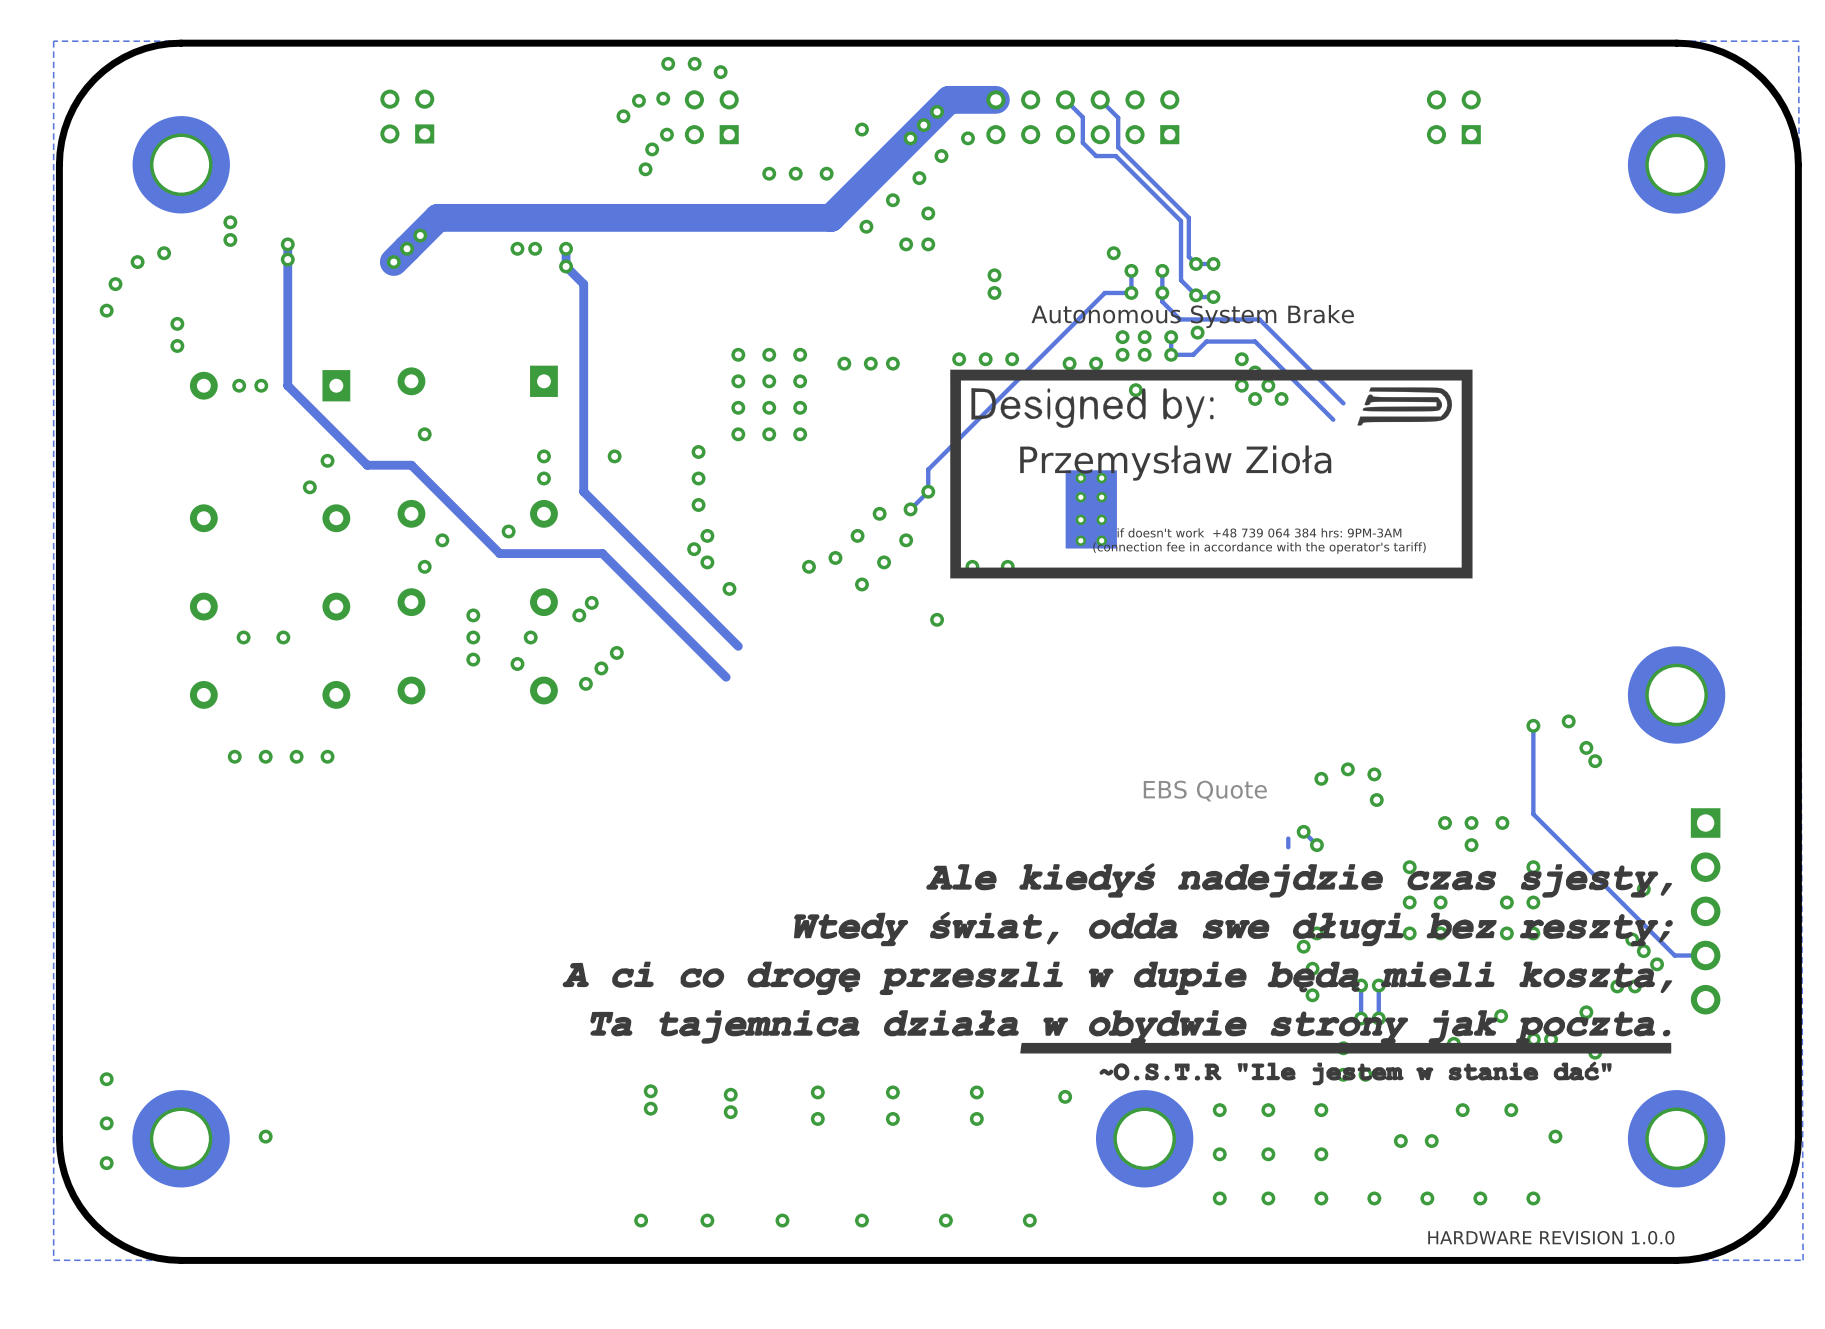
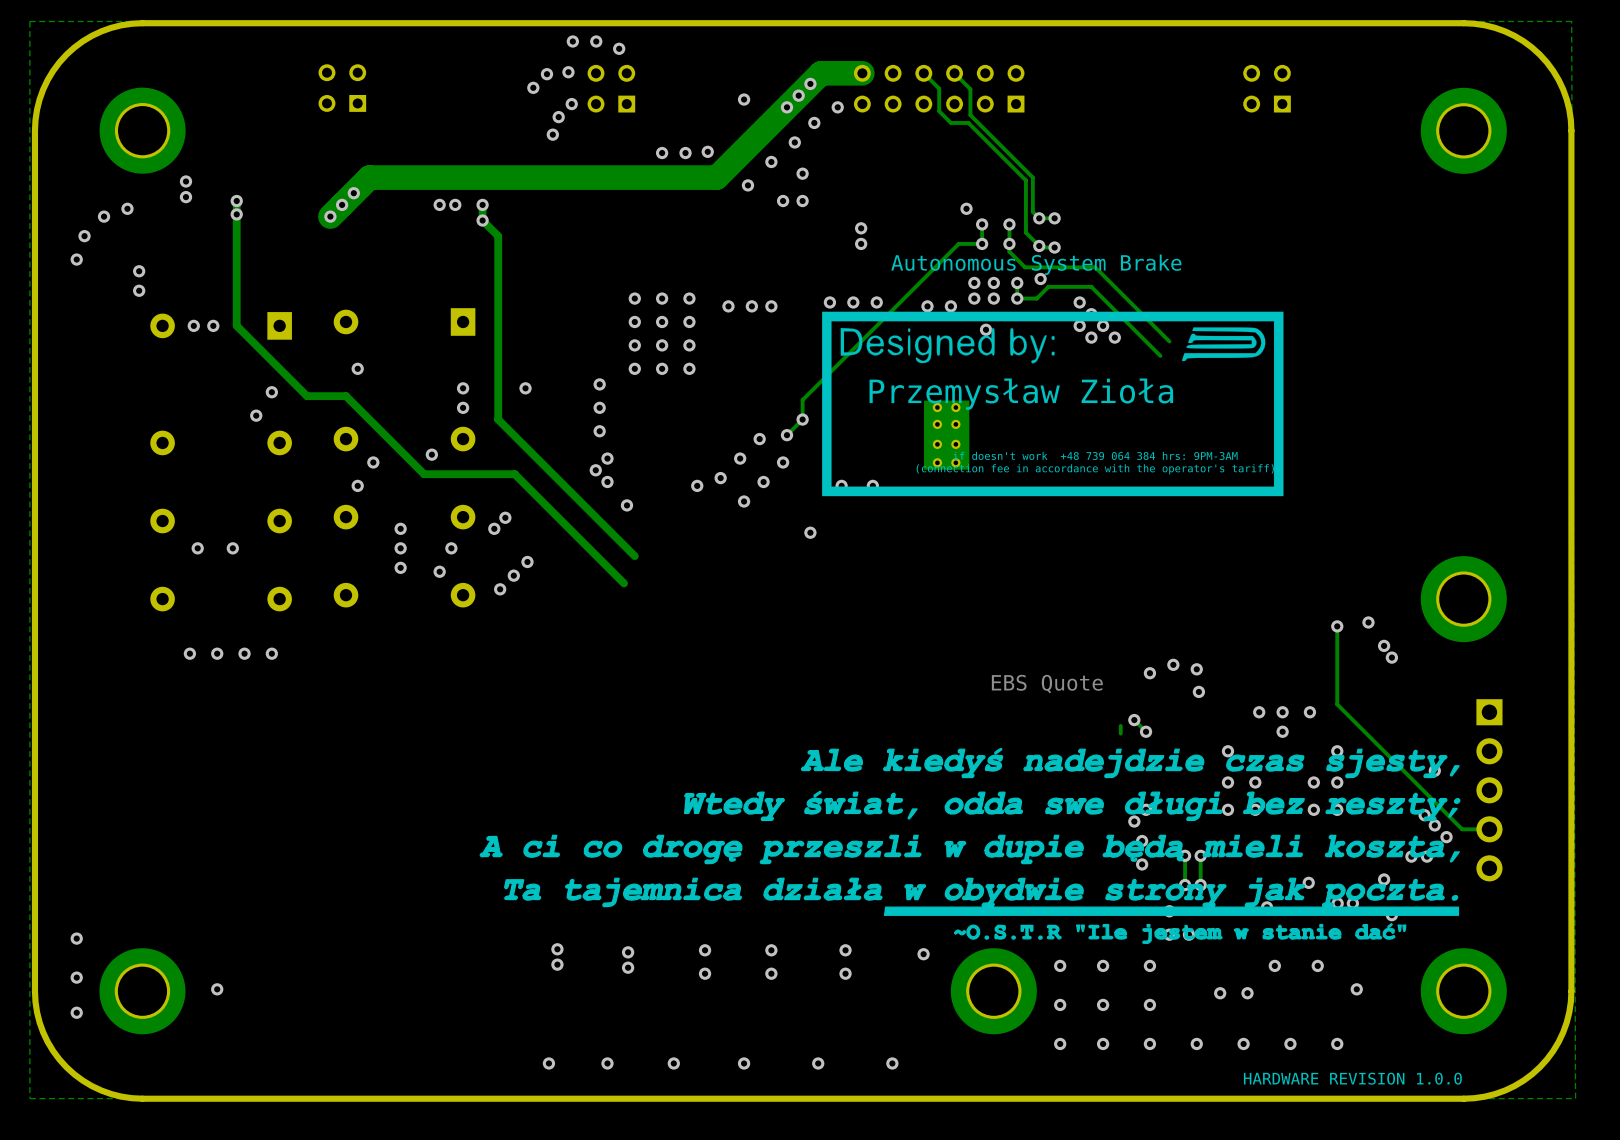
via: (769, 173) -> none
via: (795, 173) -> none
via: (826, 173) -> none
via: none -> (707, 151)
via: none -> (662, 153)
via: none -> (685, 153)

